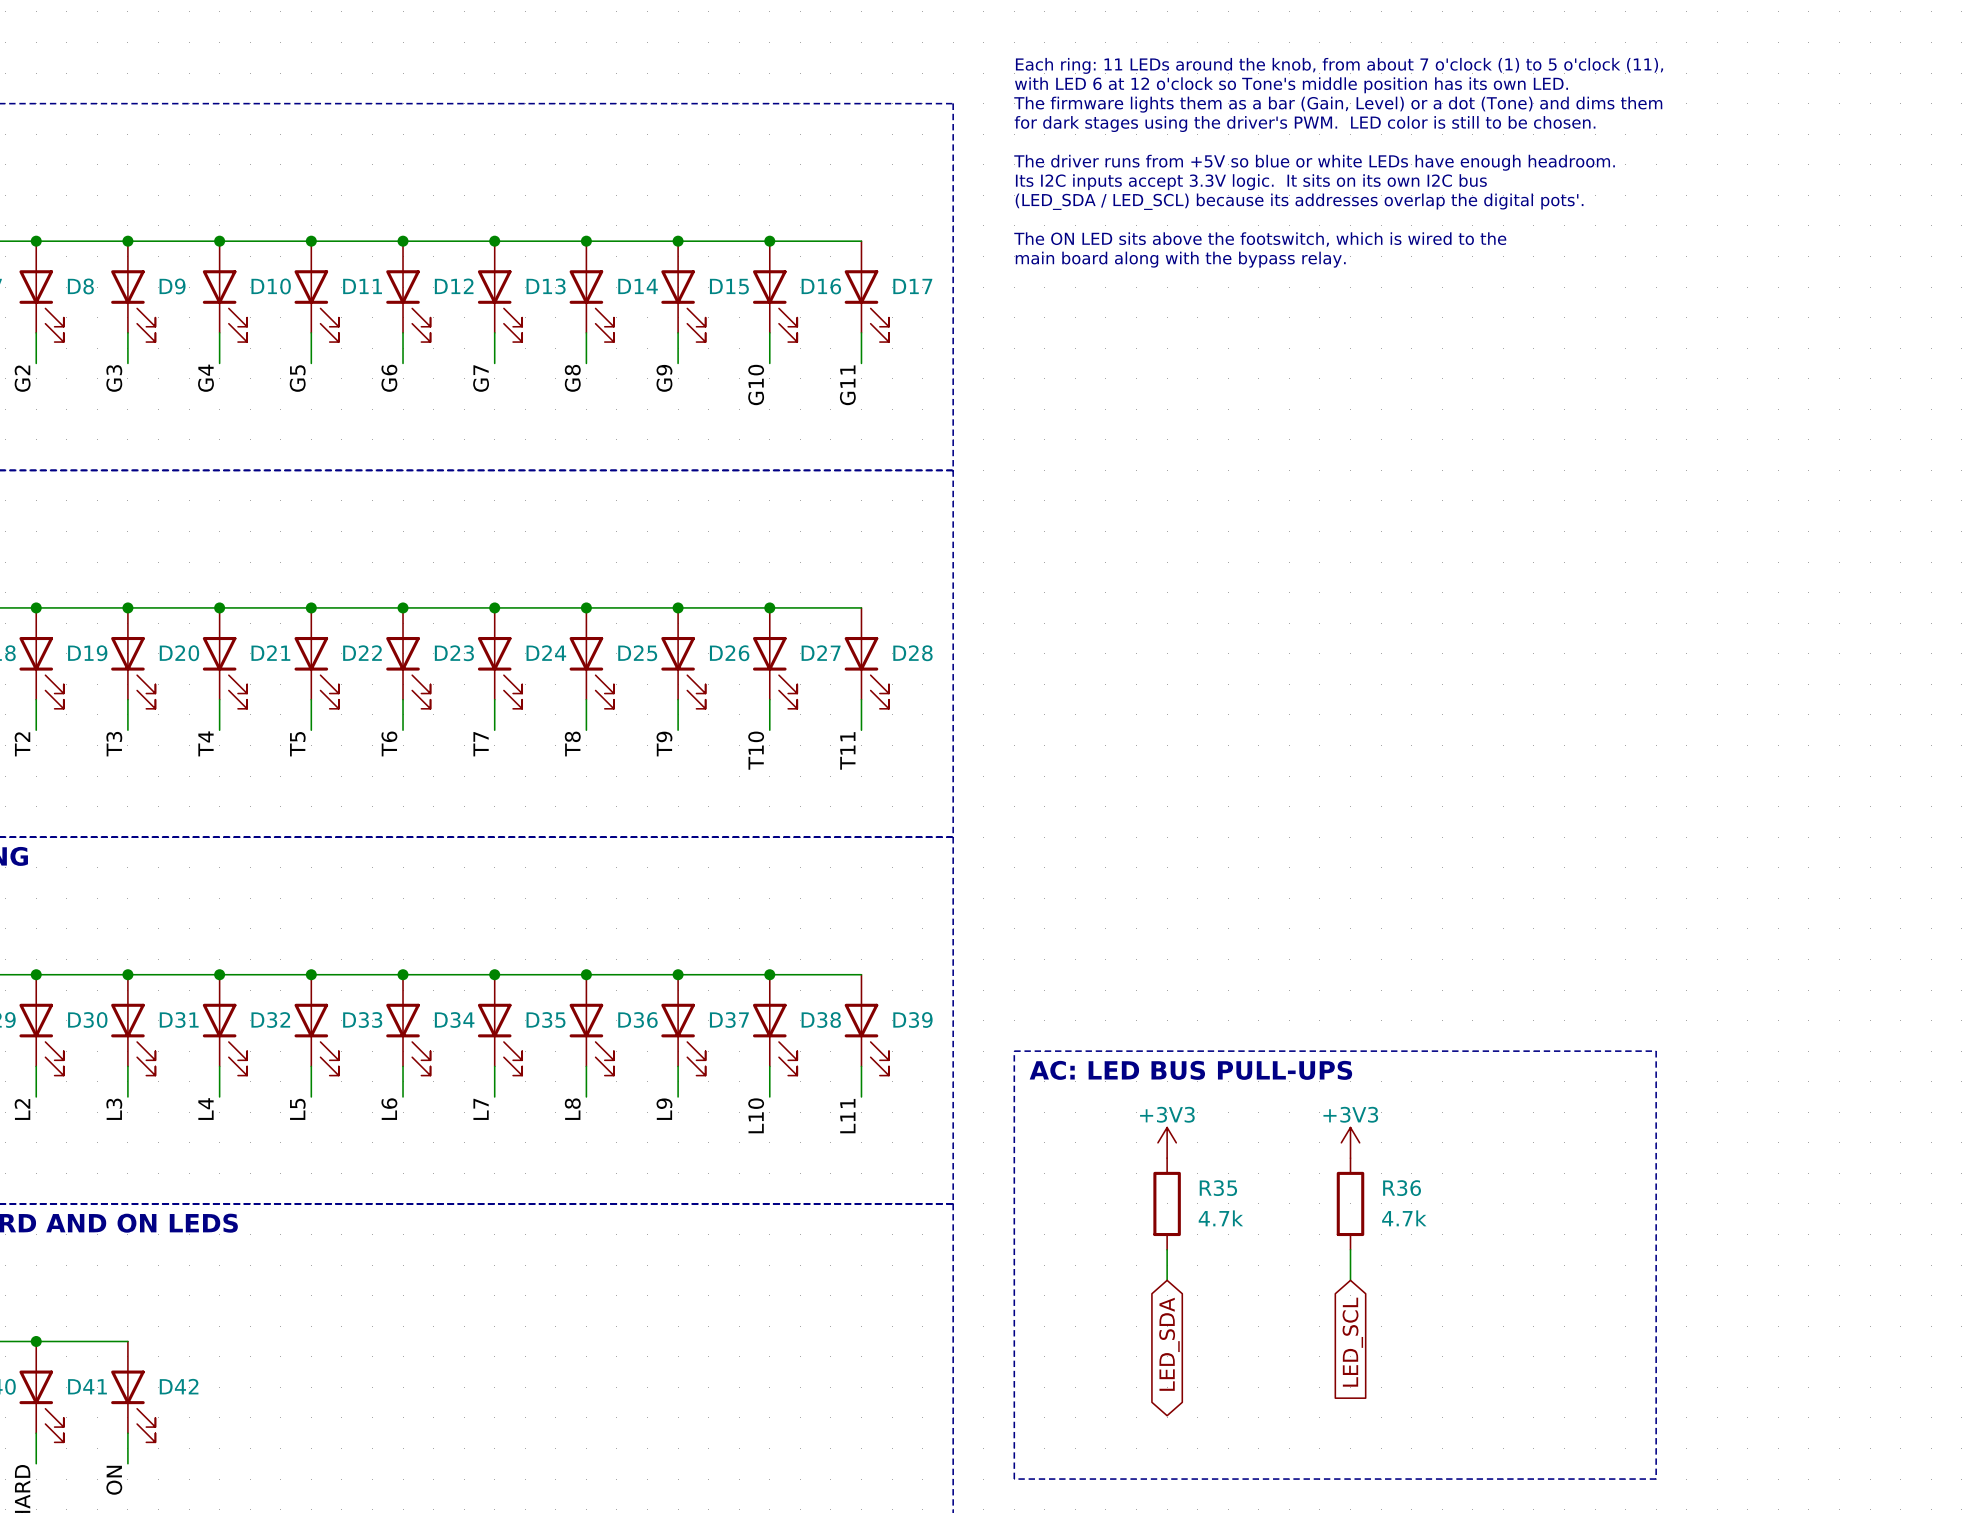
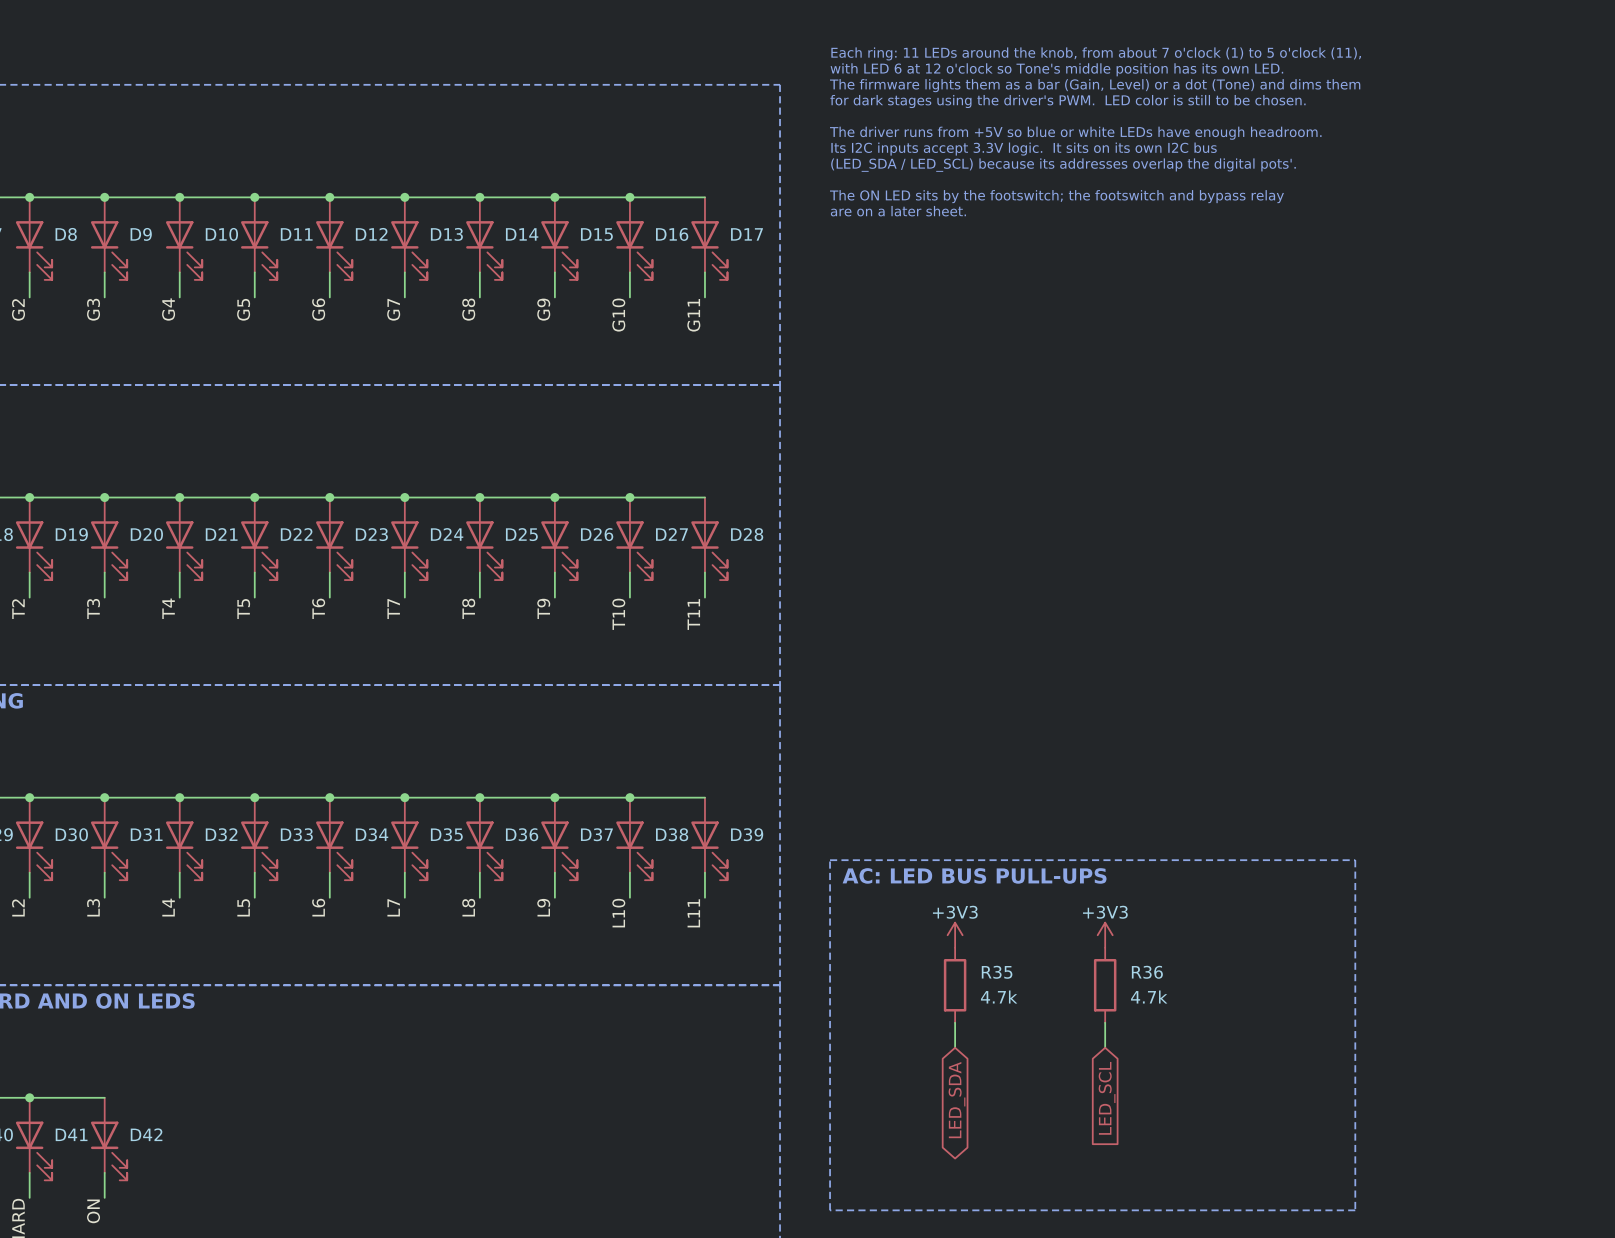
text: The ON LED sits above the footswitch, which is wired to the (1260, 239) -> The ON LED sits by the footswitch; the footswitch and bypass relay (1056, 196)
text: main board along with the bypass relay. (1180, 259) -> are on a later sheet. (898, 211)

